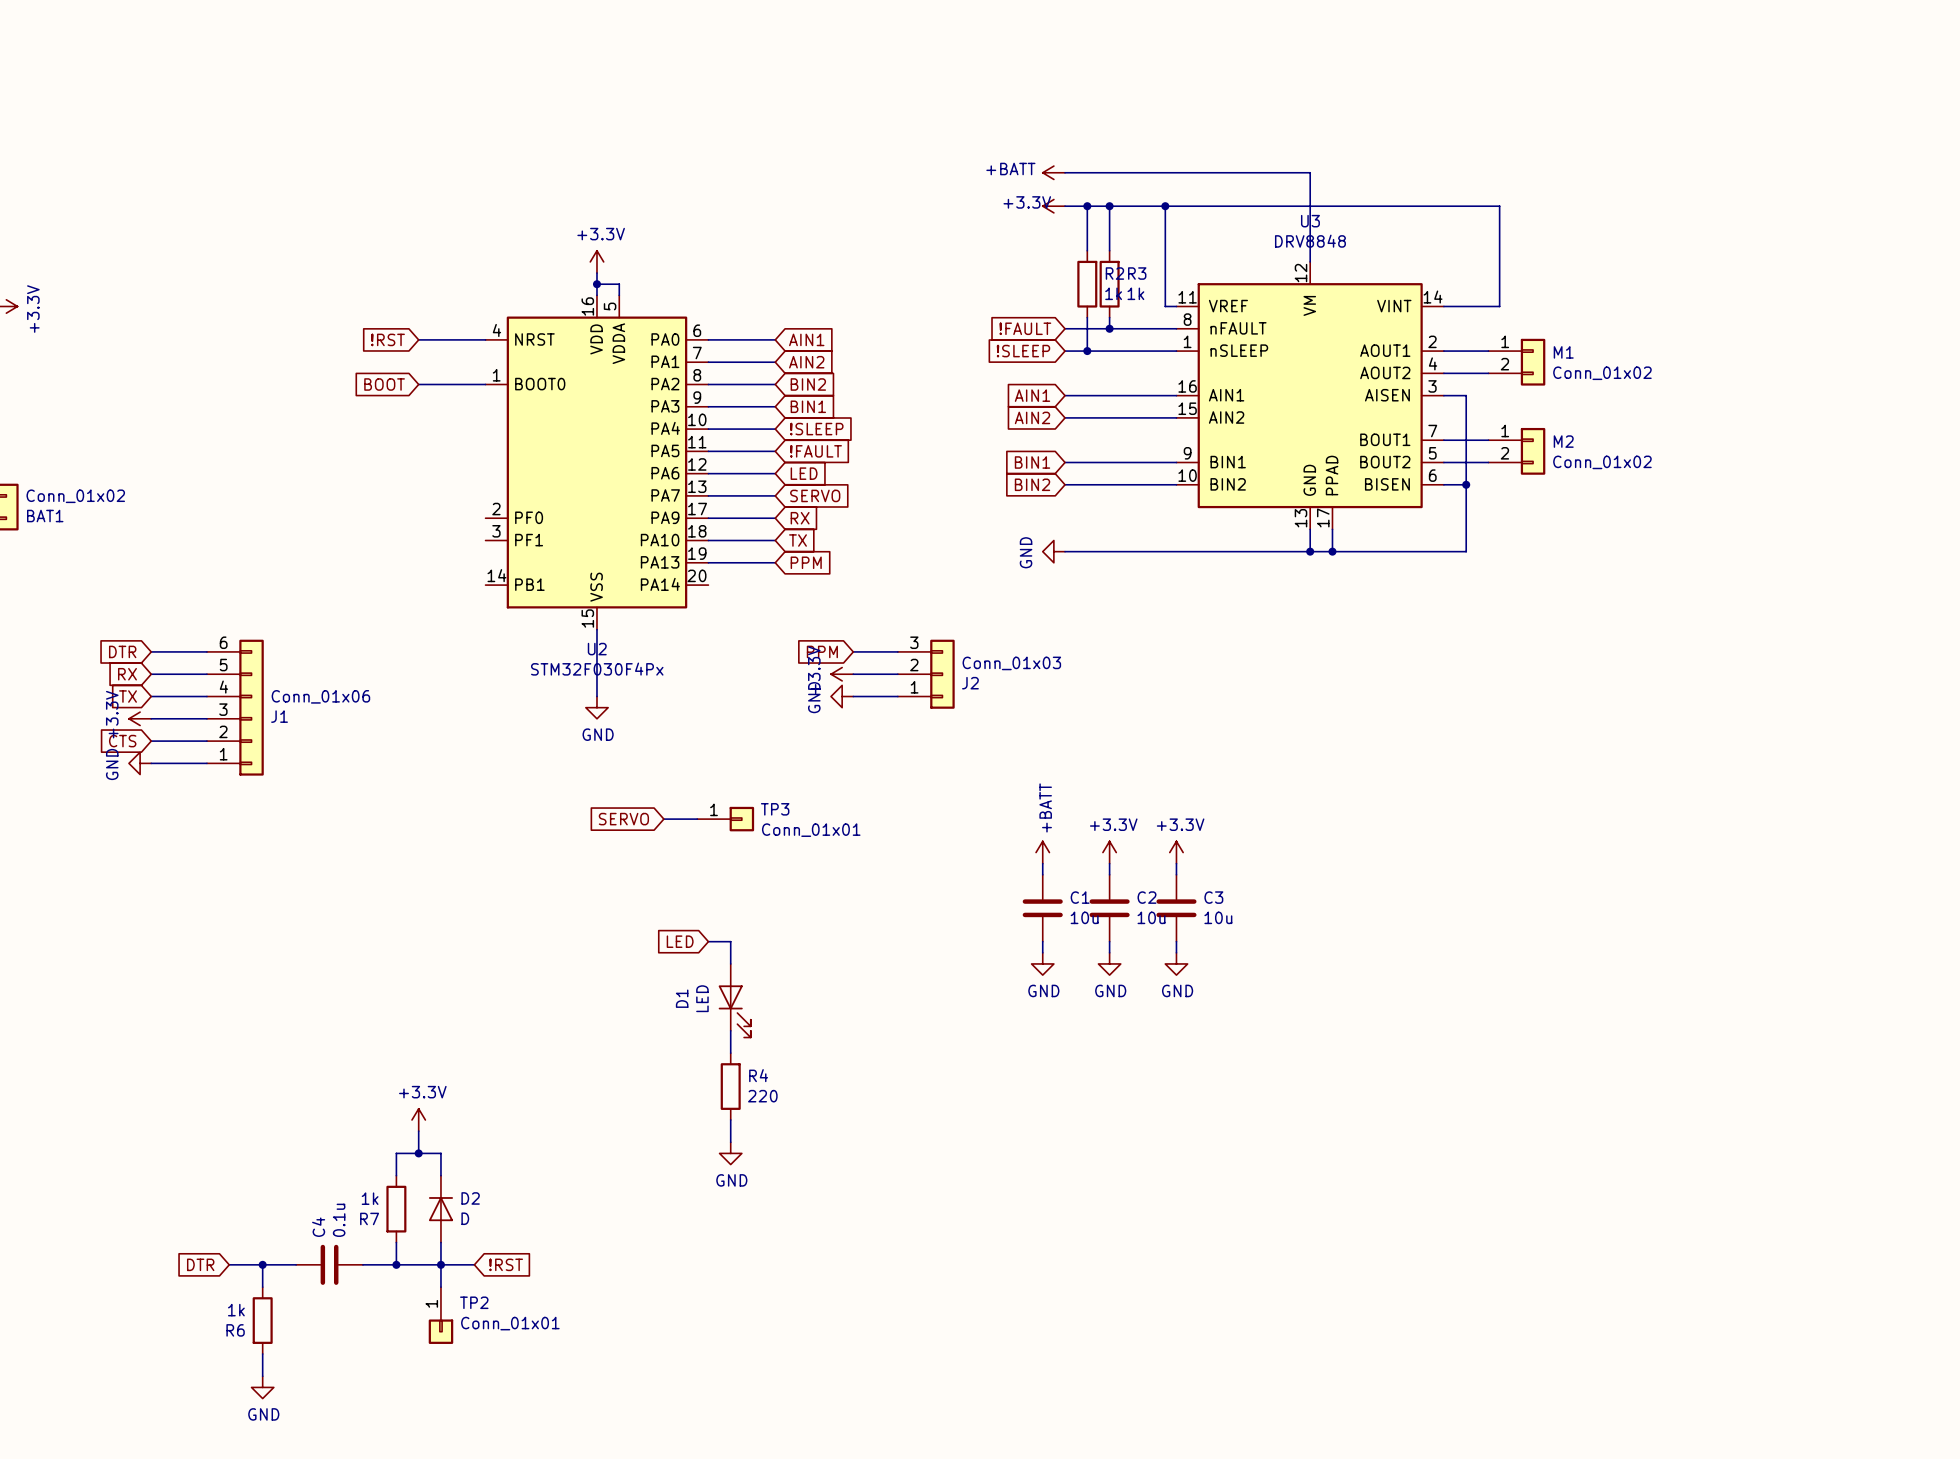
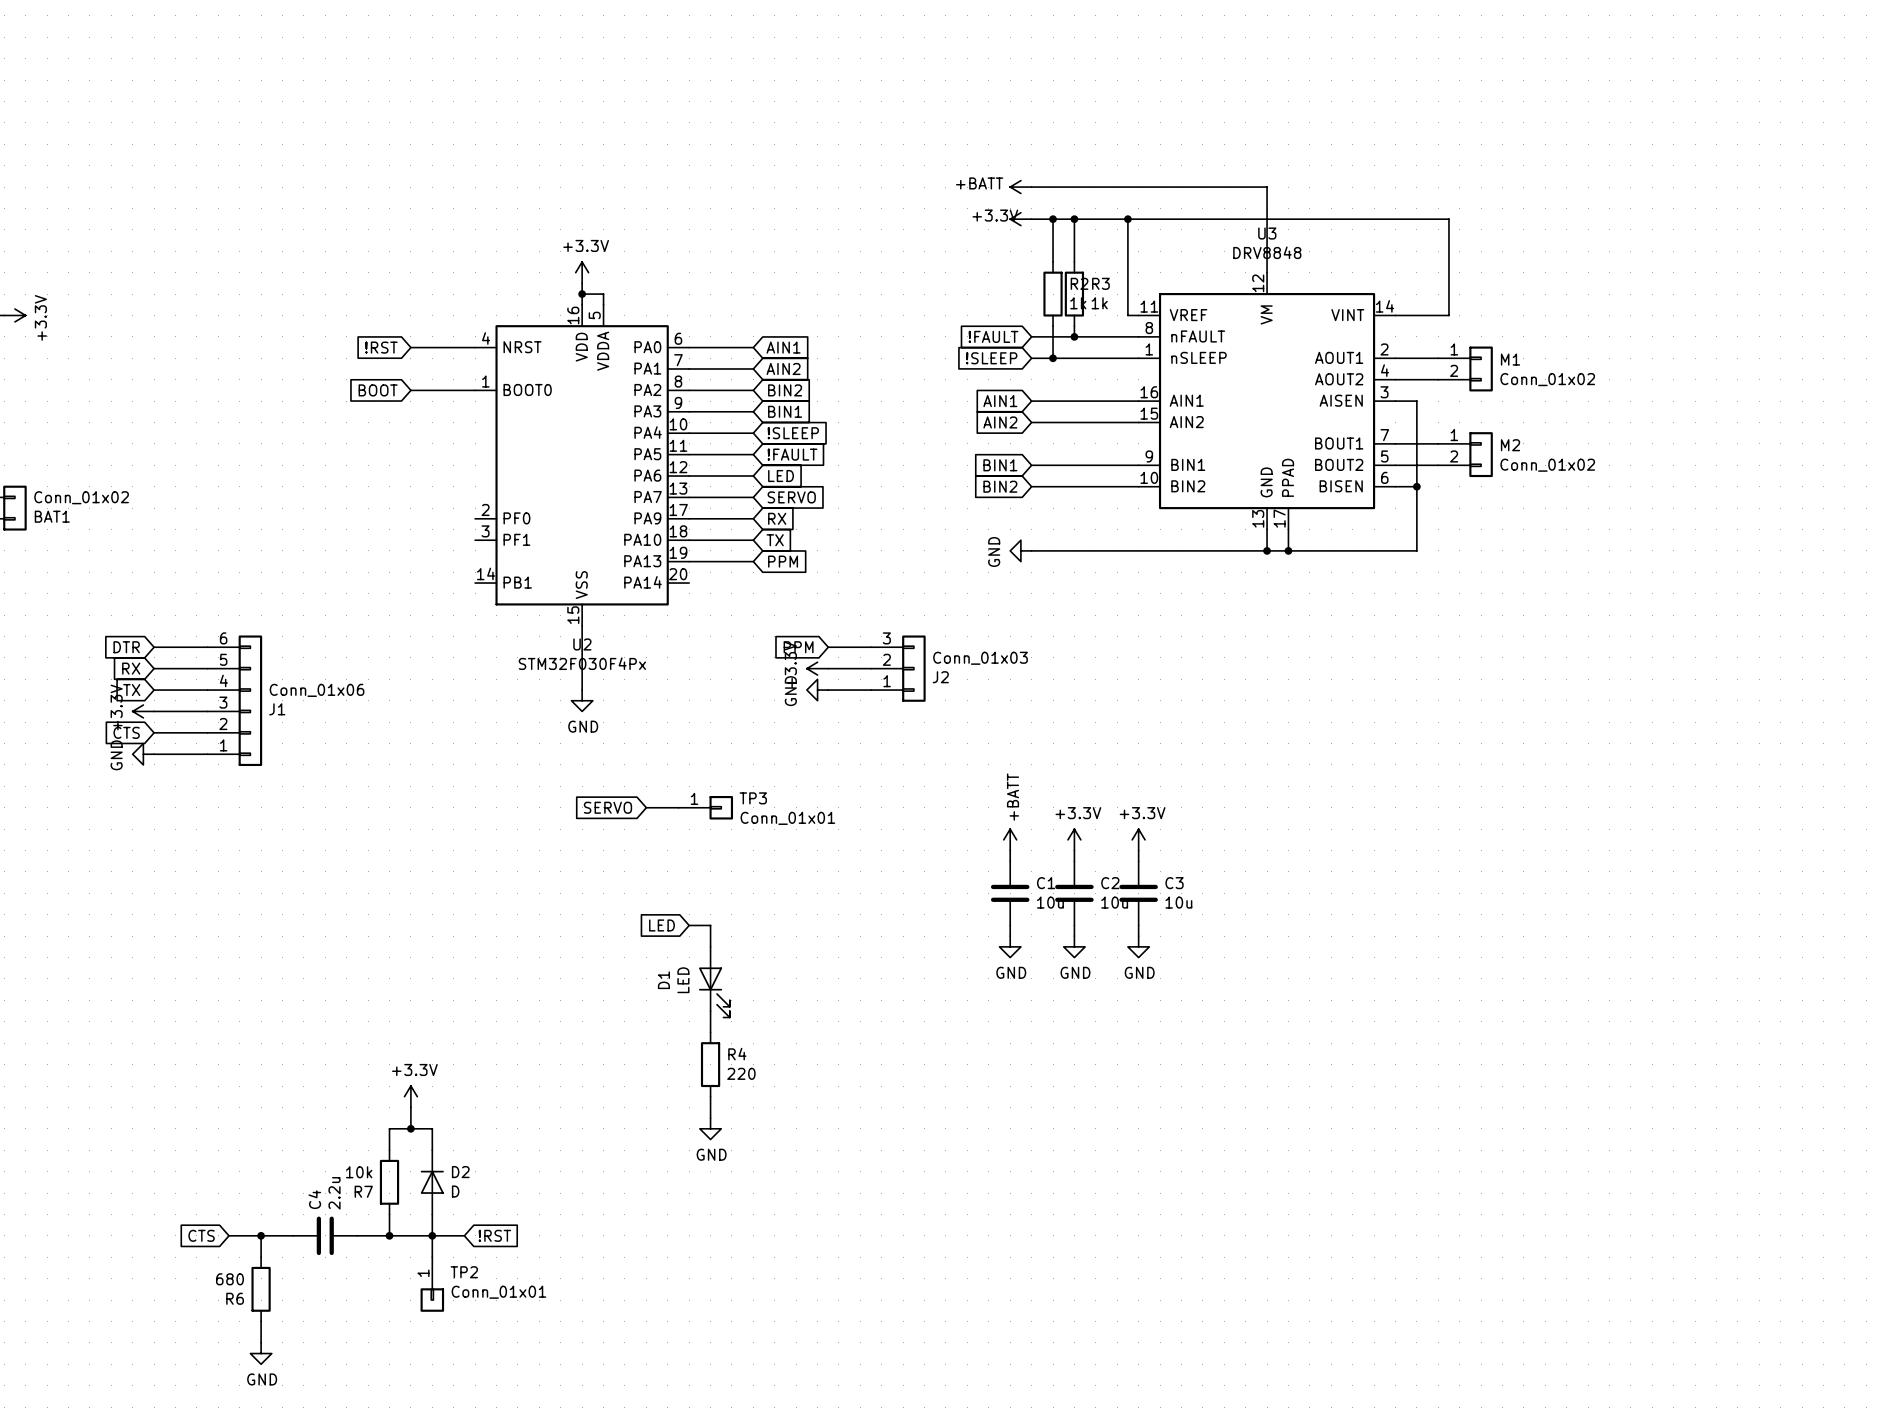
R7 value: 1k (370, 1198) -> 10k (359, 1172)
C4 value: 0.1u (339, 1220) -> 2.2u (334, 1193)
global label: DTR (200, 1264) -> CTS (201, 1235)
R6 value: 1k (236, 1310) -> 680 (229, 1279)

